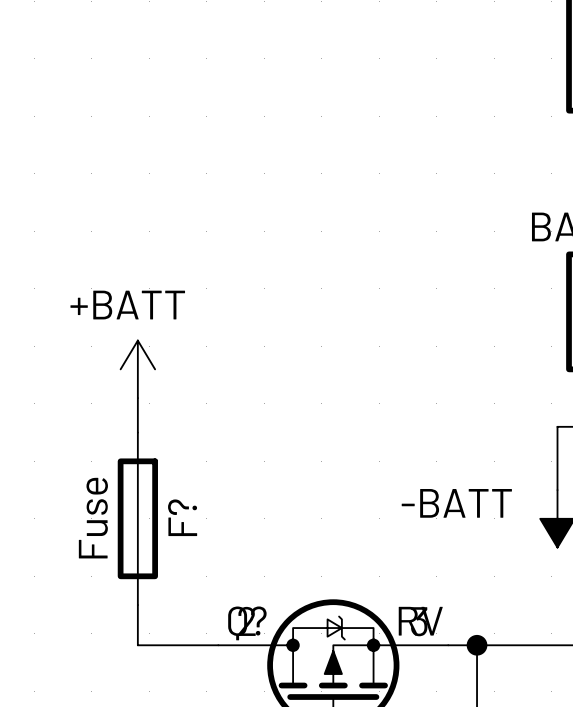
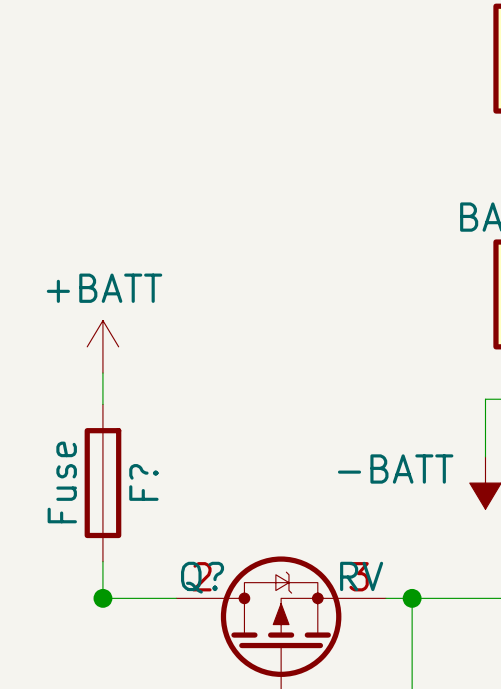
junction: none -> (102, 598)

